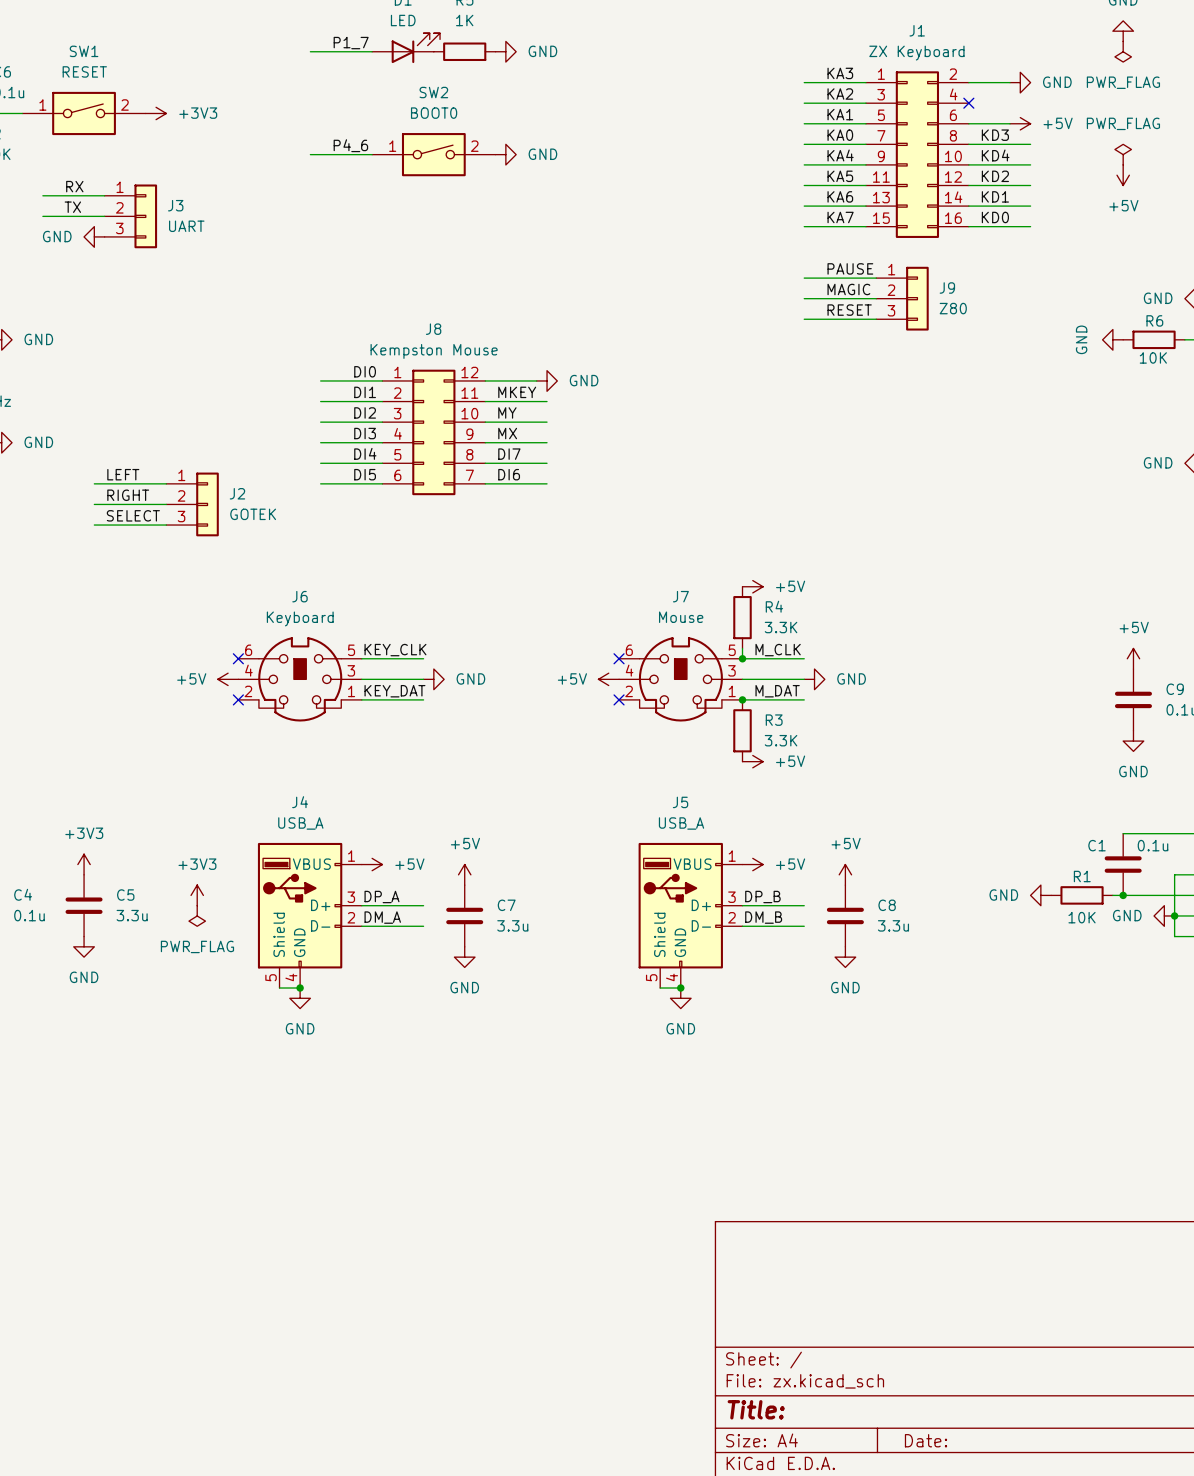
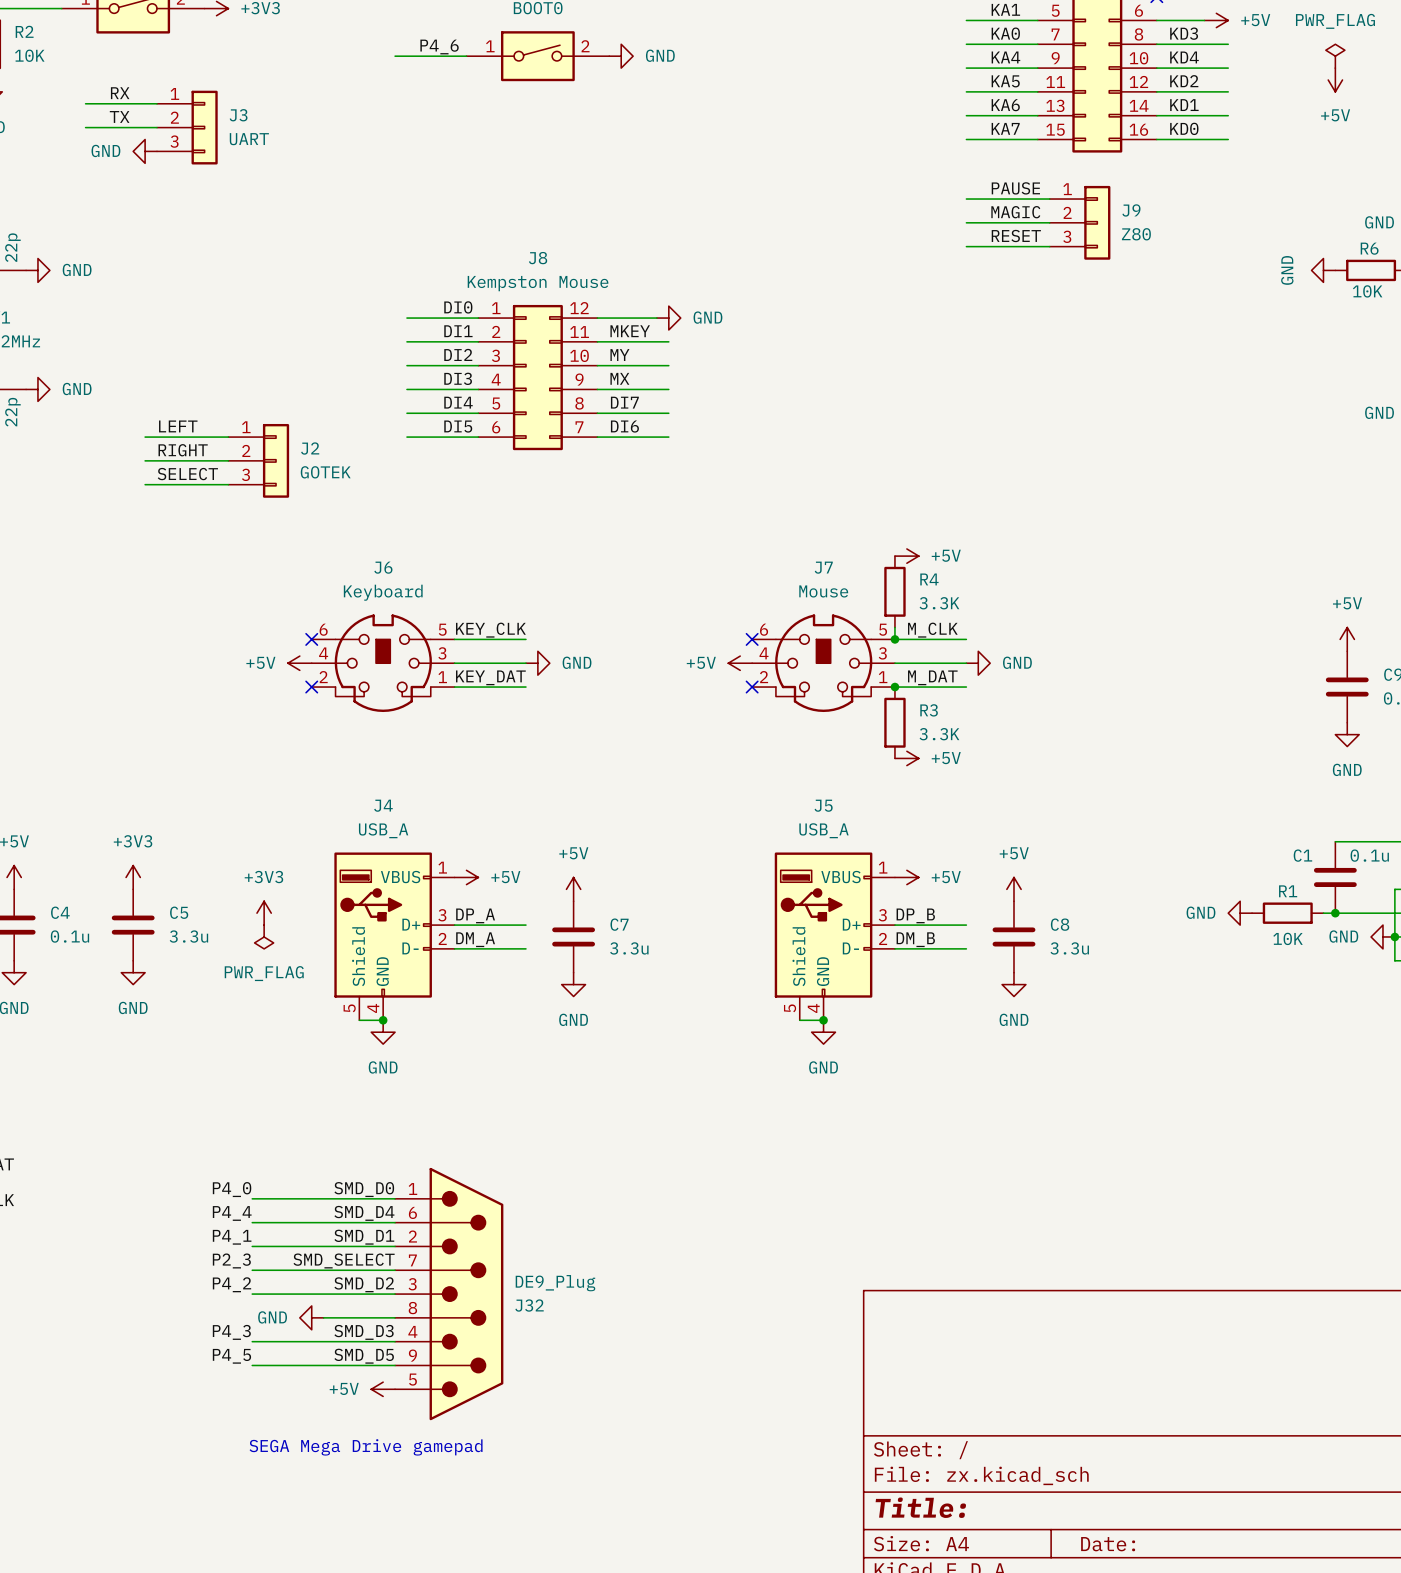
label: none -> P4_0 (232, 1189)
label: none -> SMD_D0 (364, 1189)
wire: none -> (252, 1198) (395, 1198)
label: none -> P4_4 (232, 1213)
label: none -> SMD_D4 (364, 1213)
wire: none -> (252, 1222) (395, 1222)
label: none -> P4_1 (232, 1237)
label: none -> SMD_D1 (364, 1237)
wire: none -> (252, 1246) (395, 1246)
label: none -> P2_3 (231, 1260)
label: none -> SMD_SELECT (344, 1260)
wire: none -> (252, 1270) (395, 1270)
label: none -> P4_2 (231, 1284)
label: none -> SMD_D2 (364, 1284)
wire: none -> (252, 1294) (395, 1294)
J32: none -> DE9_Plug (449, 1294)
power symbol: none -> GND (311, 1317)
wire: none -> (323, 1317) (395, 1317)
label: none -> P4_3 (231, 1332)
label: none -> SMD_D3 (364, 1332)
wire: none -> (252, 1341) (395, 1341)
label: none -> P4_5 (231, 1356)
label: none -> SMD_D5 (364, 1356)
wire: none -> (252, 1365) (395, 1365)
power symbol: none -> +5V (383, 1389)
text: none -> SEGA Mega Drive gamepad (366, 1447)

